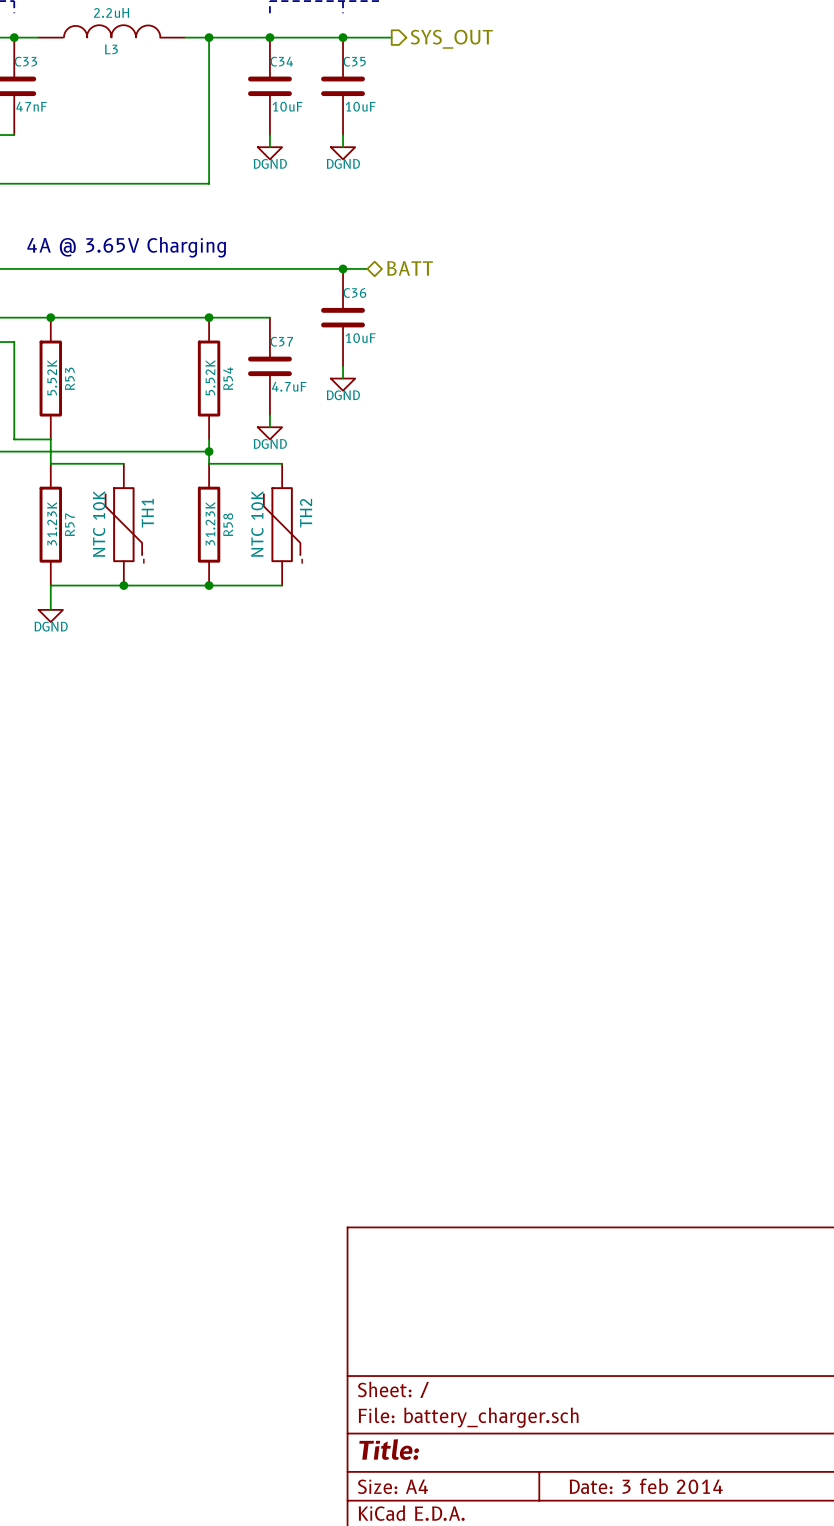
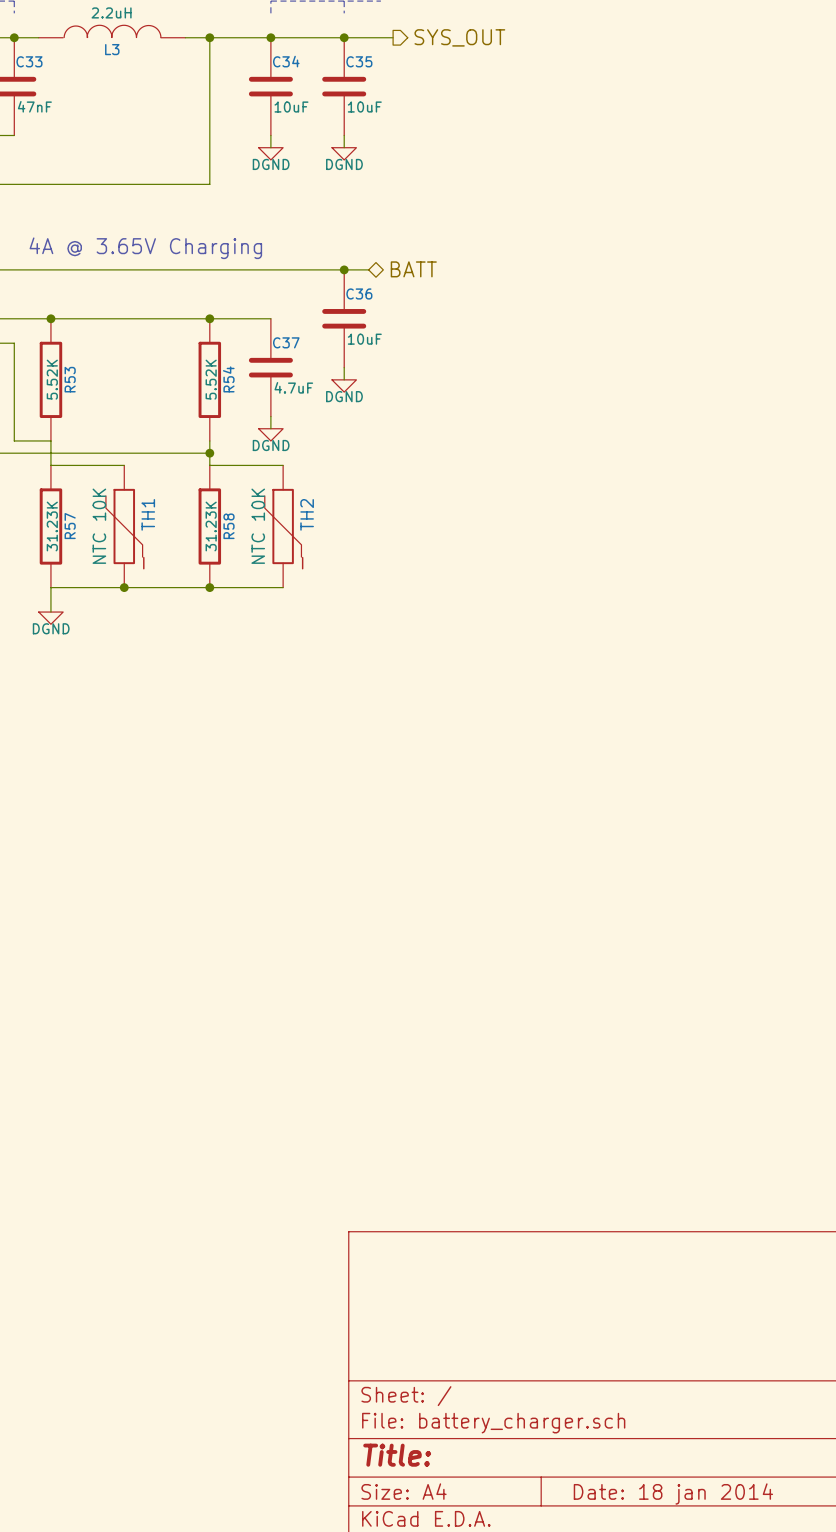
title block: Date: 3 feb 2014 (646, 1486) -> Date: 18 jan 2014 (673, 1493)

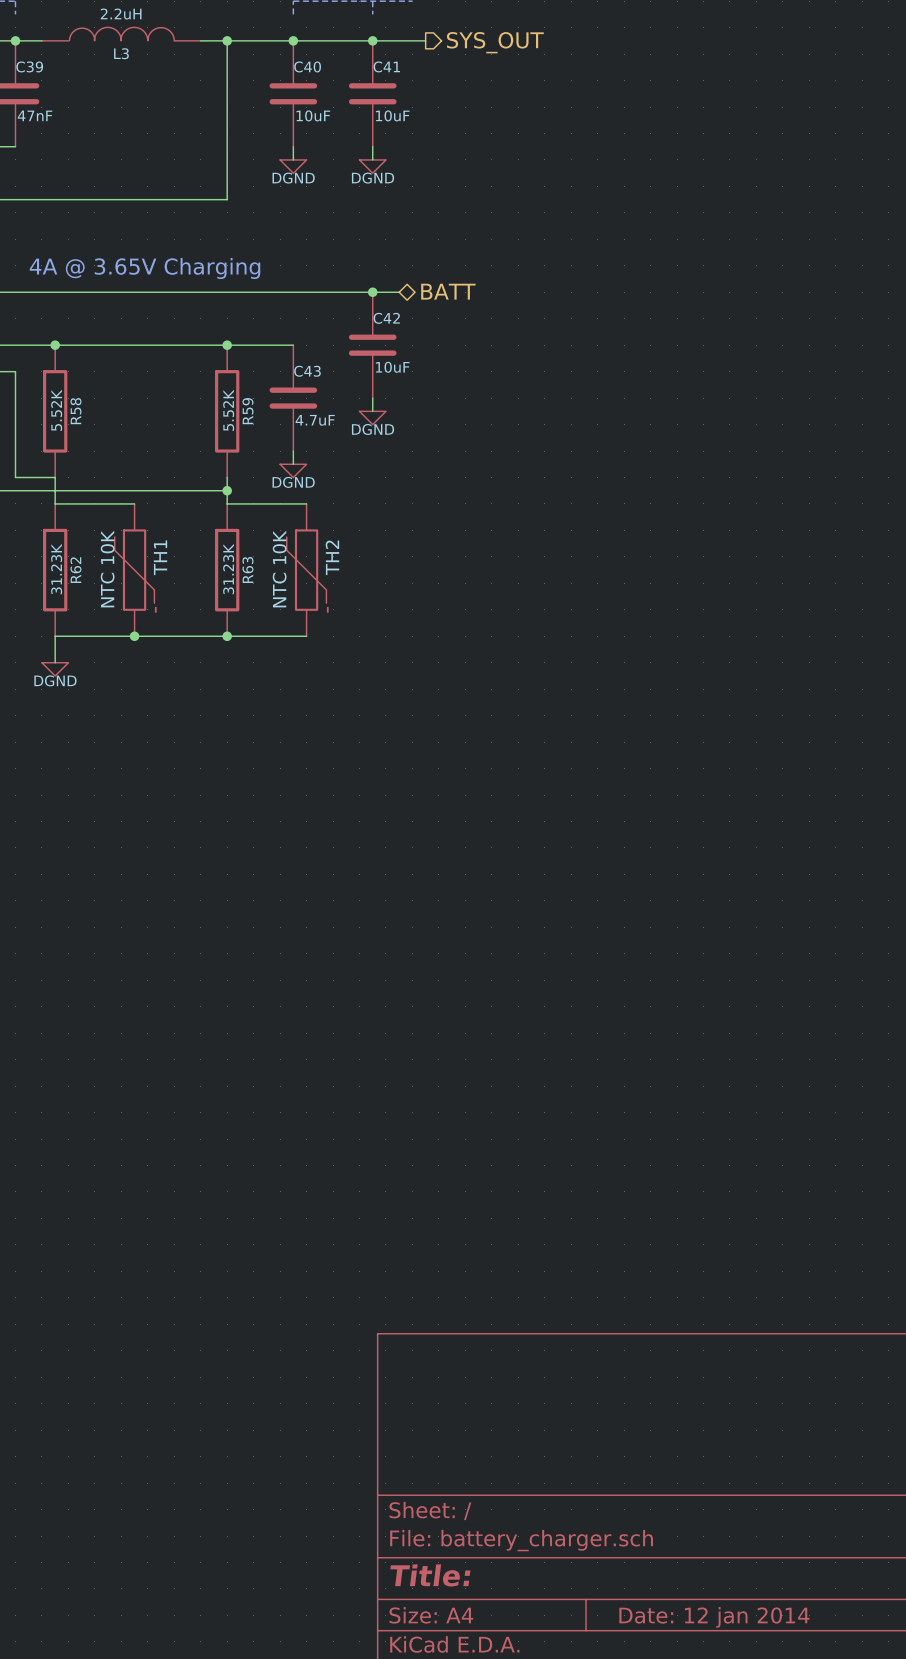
C33 name: C33 (29, 61) -> C39 (29, 66)
C34 name: C34 (286, 61) -> C40 (307, 66)
C35 name: C35 (359, 61) -> C41 (386, 66)
C36 name: C36 (359, 293) -> C42 (386, 318)
C37 name: C37 (286, 342) -> C43 (307, 371)
R53 name: R53 (70, 379) -> R58 (75, 411)
R54 name: R54 (228, 379) -> R59 (247, 411)
R57 name: R57 (70, 526) -> R62 (75, 570)
R58 name: R58 (228, 526) -> R63 (247, 569)
title block: Date: 18 jan 2014 (673, 1493) -> Date: 12 jan 2014 (714, 1617)

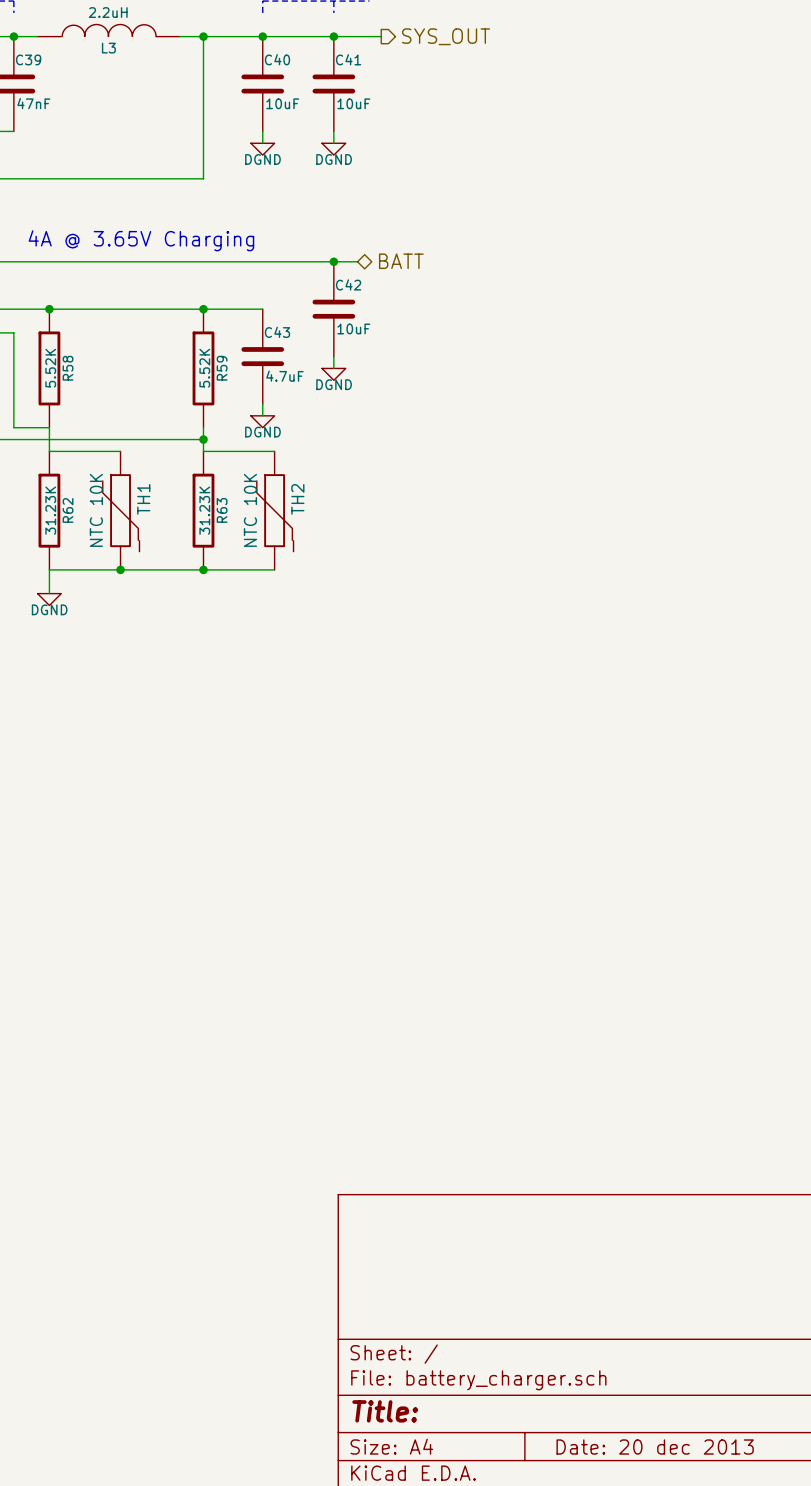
title block: Date: 12 jan 2014 (714, 1617) -> Date: 20 dec 2013 (655, 1447)

